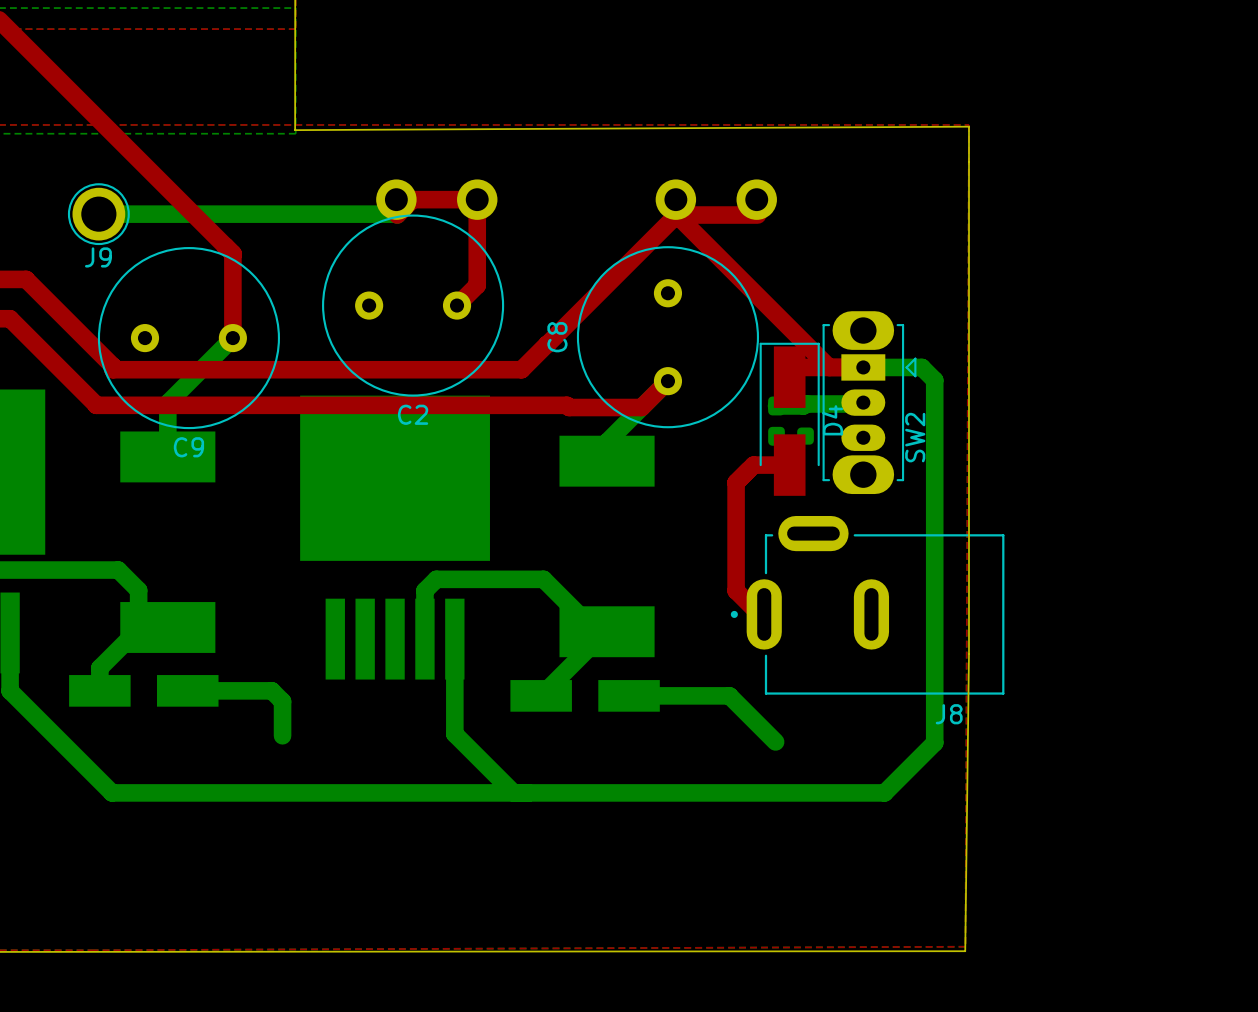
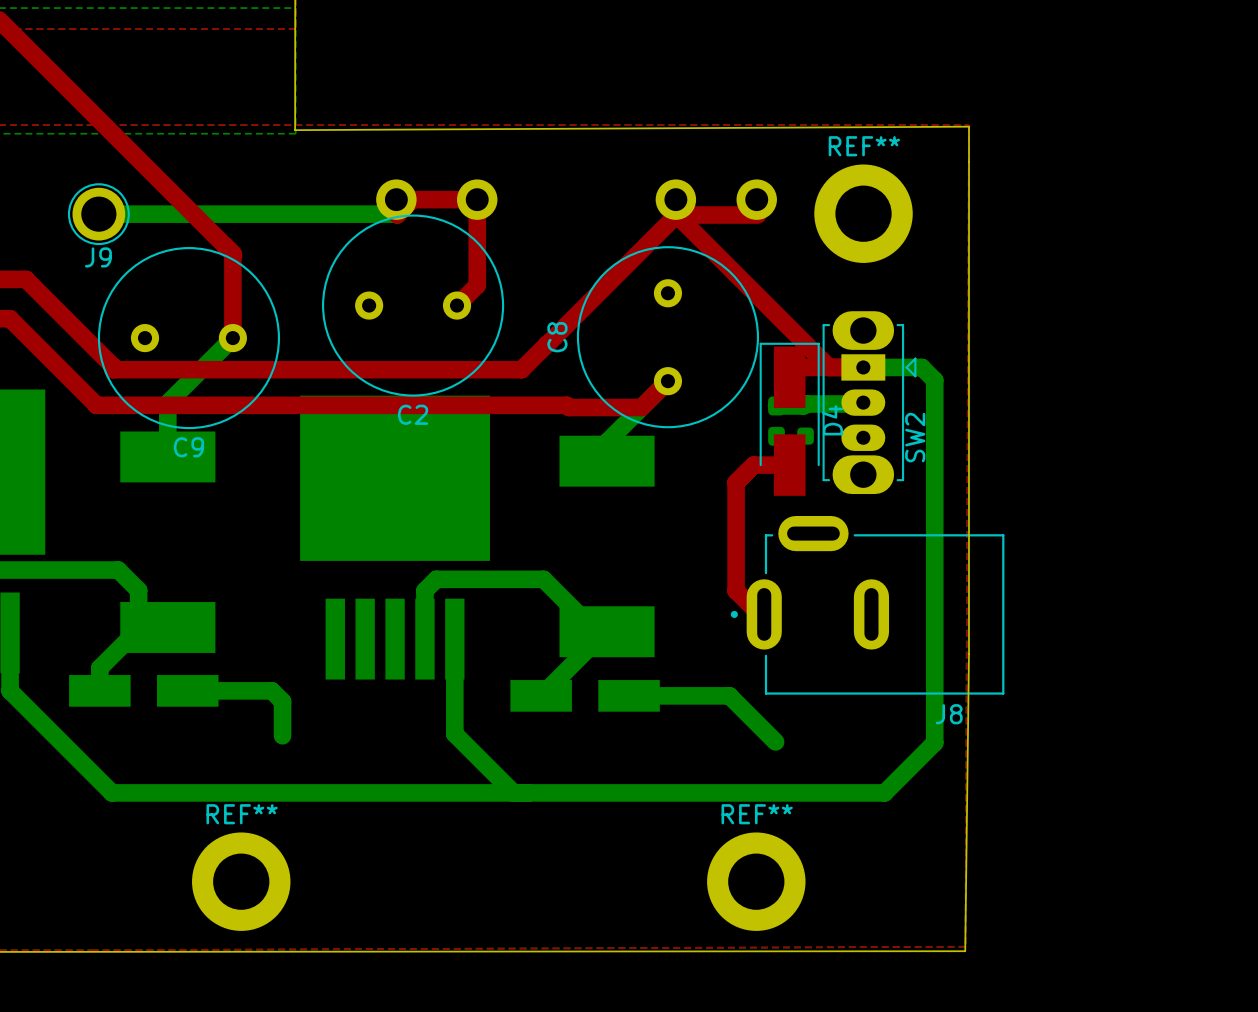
REF**: none -> (863, 213)
REF**: none -> (241, 881)
REF**: none -> (756, 881)

